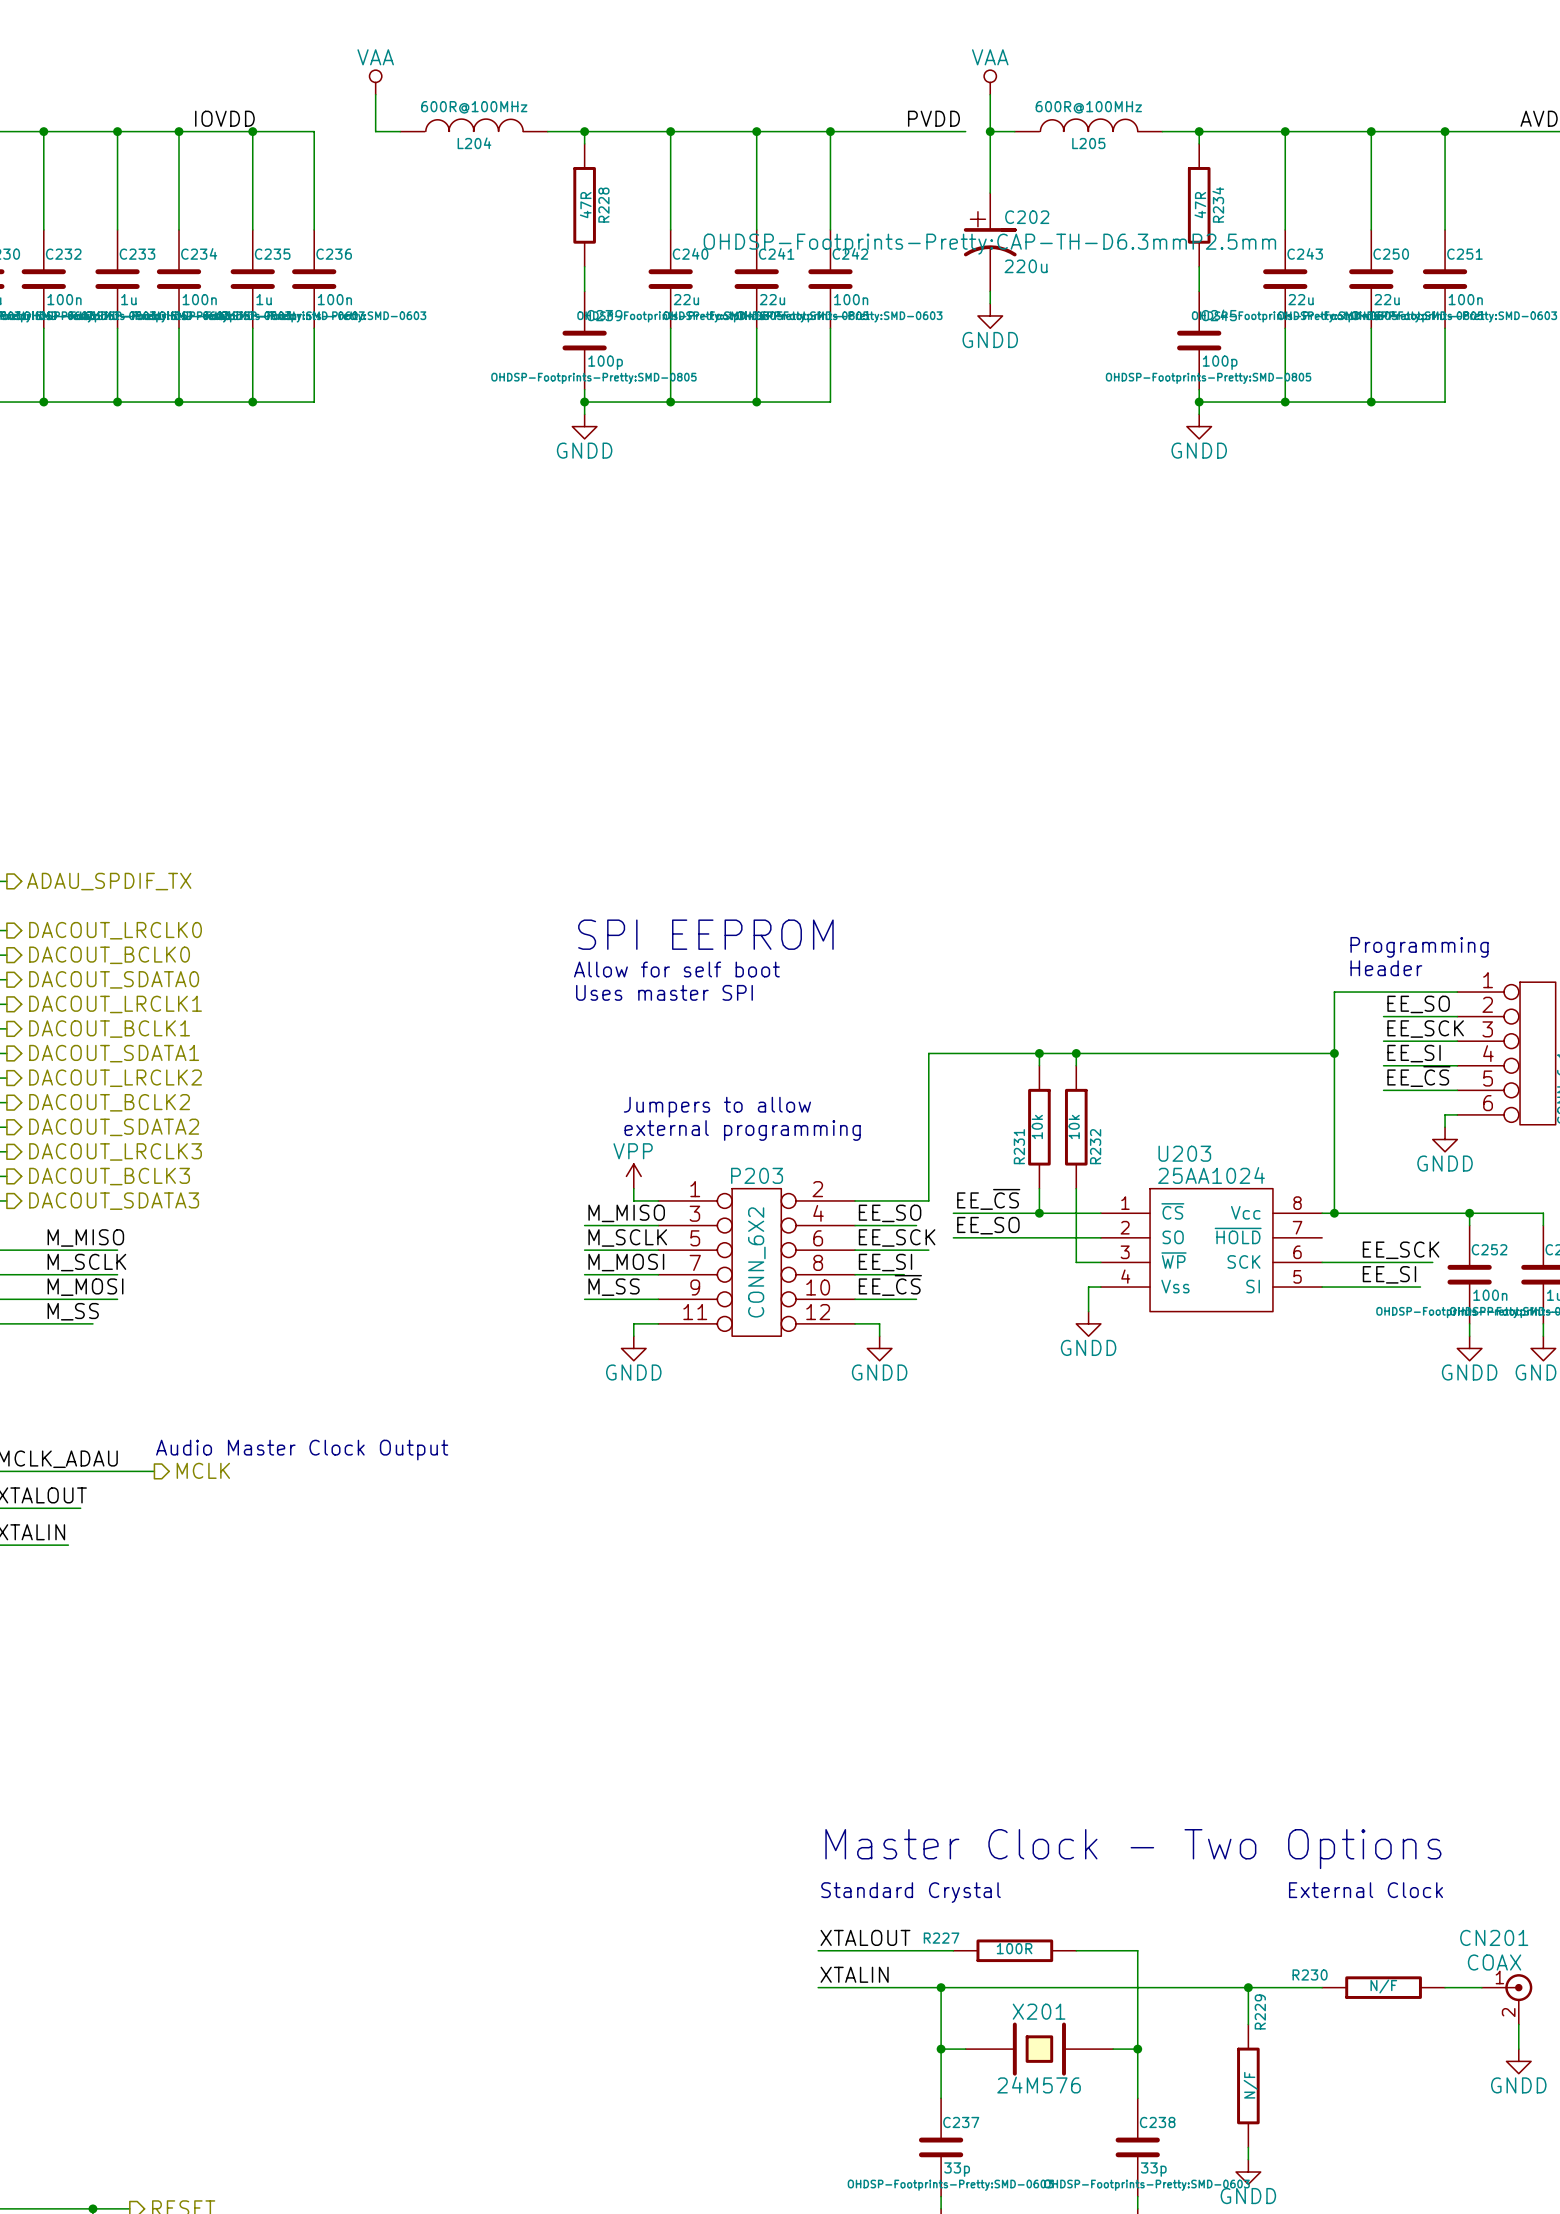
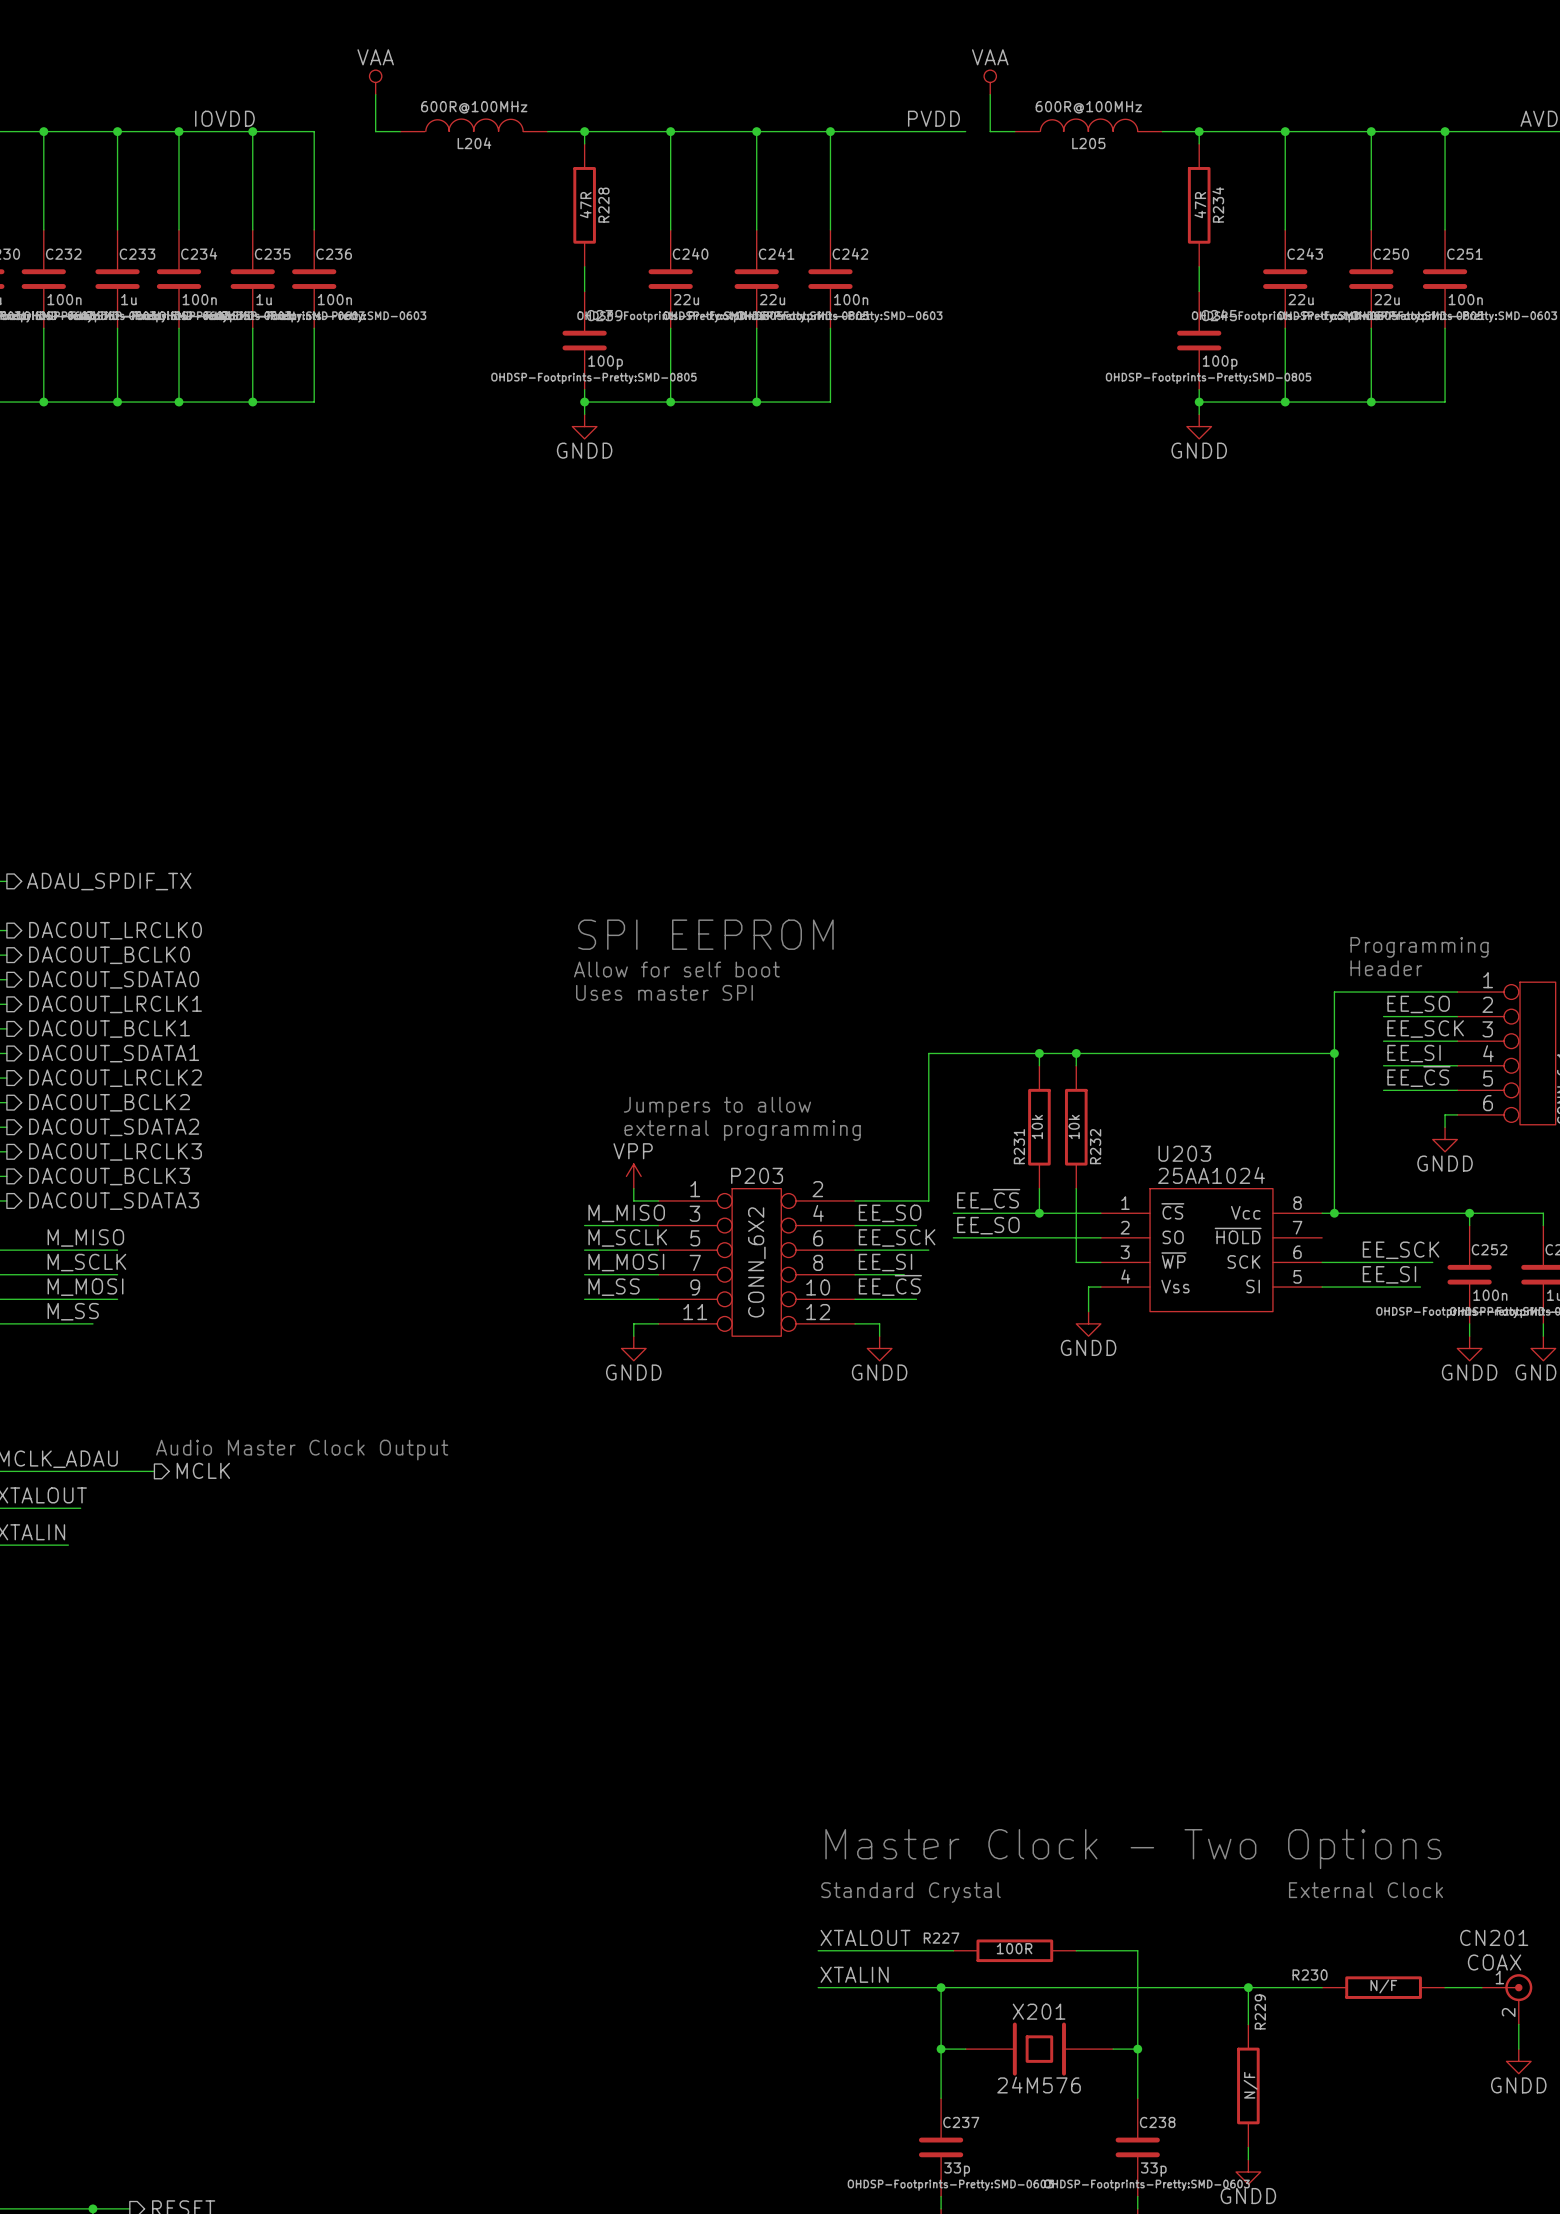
wire: (990, 131) (990, 193) -> none
junction: (990, 131) -> none
C202: 220u (990, 242) -> none
wire: (990, 291) (990, 303) -> none
power symbol: GNDD (990, 315) -> none

